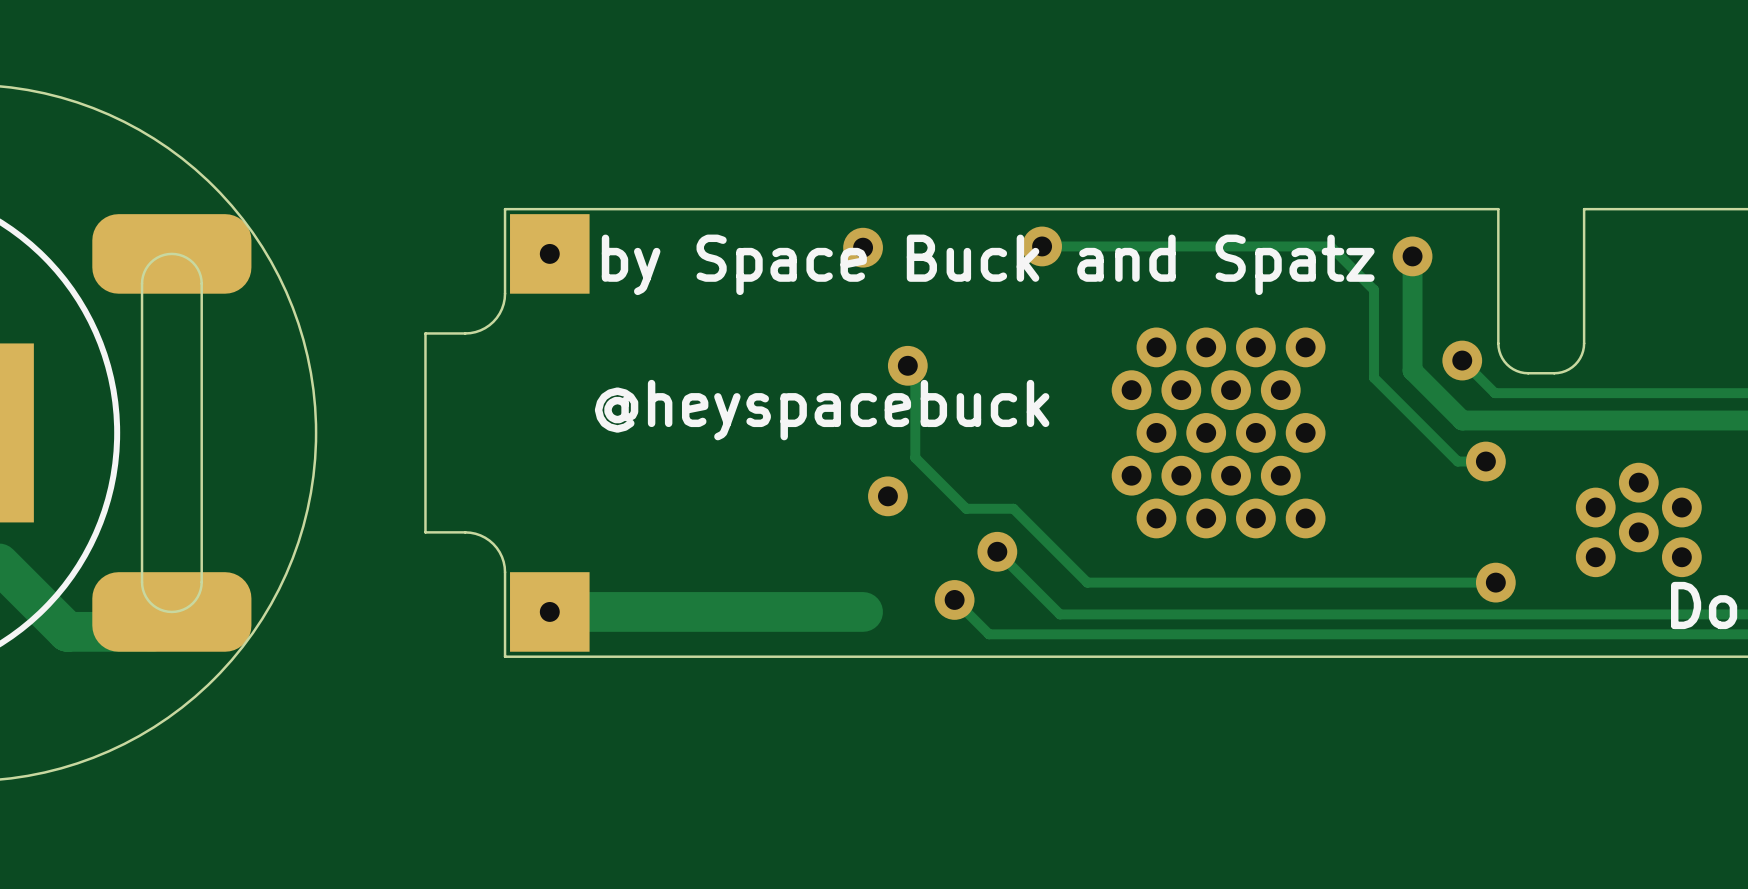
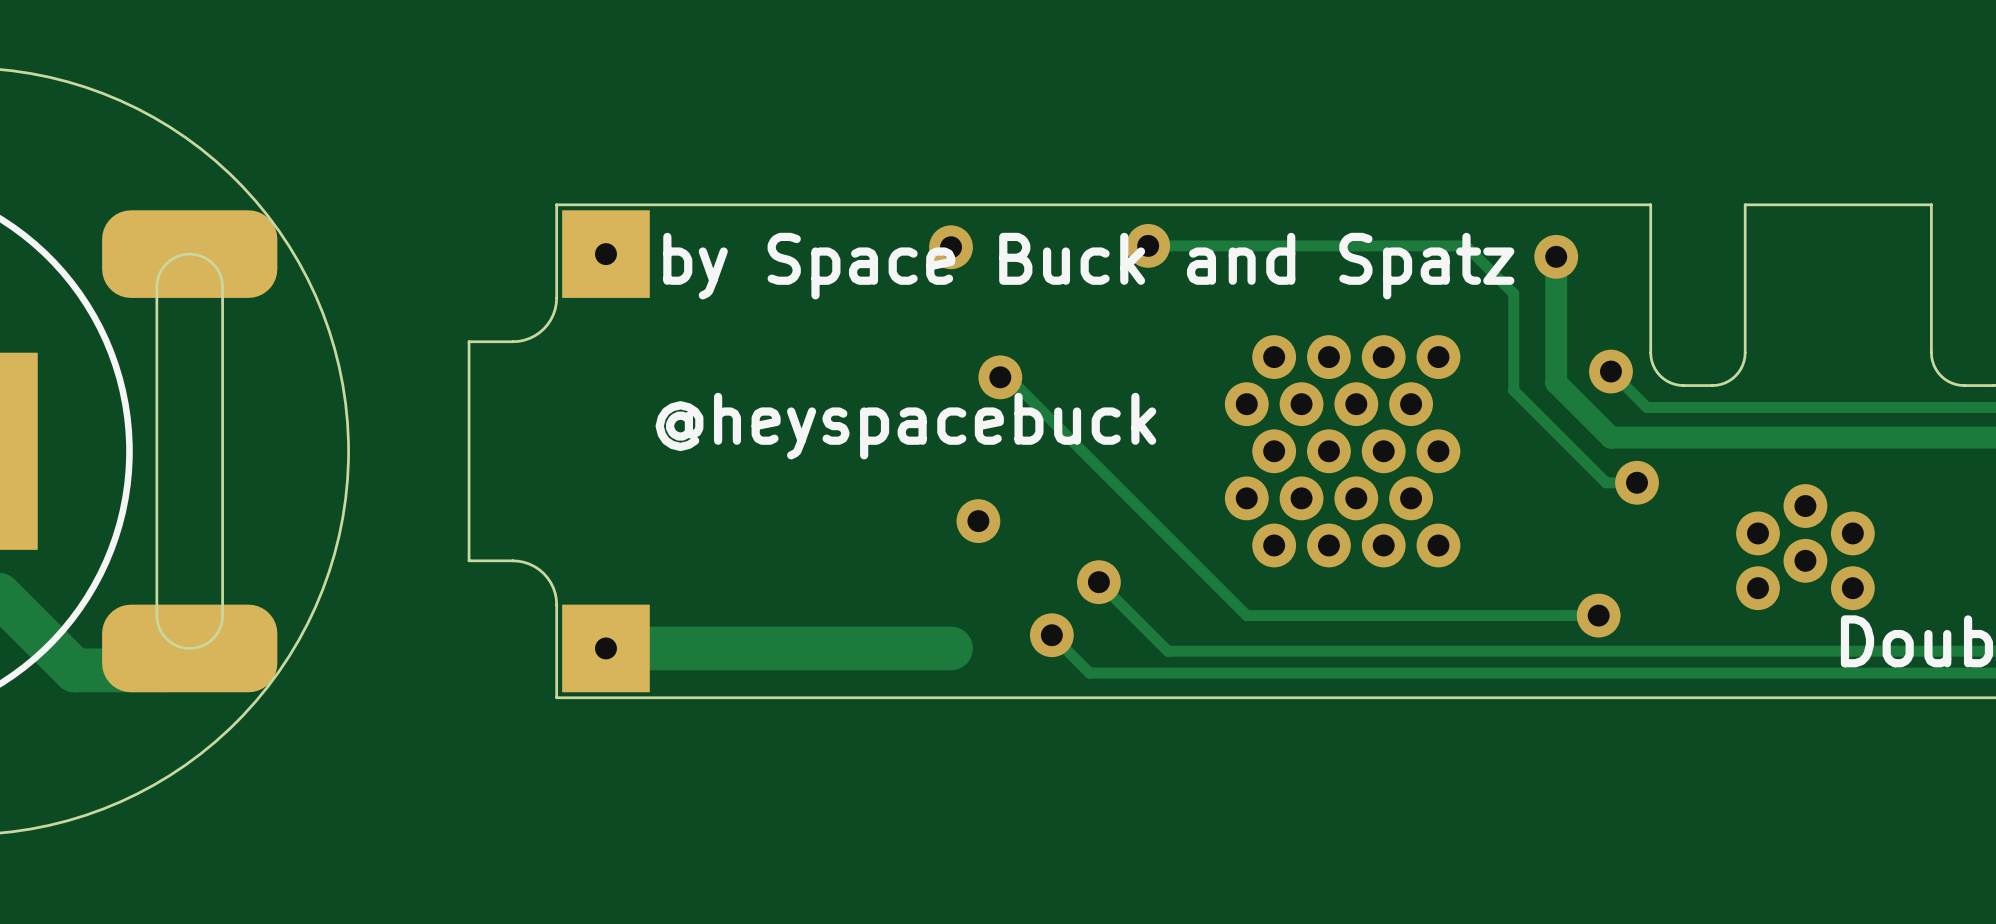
track: (915, 365) (915, 457) (966, 508) (1013, 508) (1087, 582) (1495, 582) -> (1008, 377) (1246, 615) (1598, 615)
via position: (1495, 582) -> (1598, 615)

